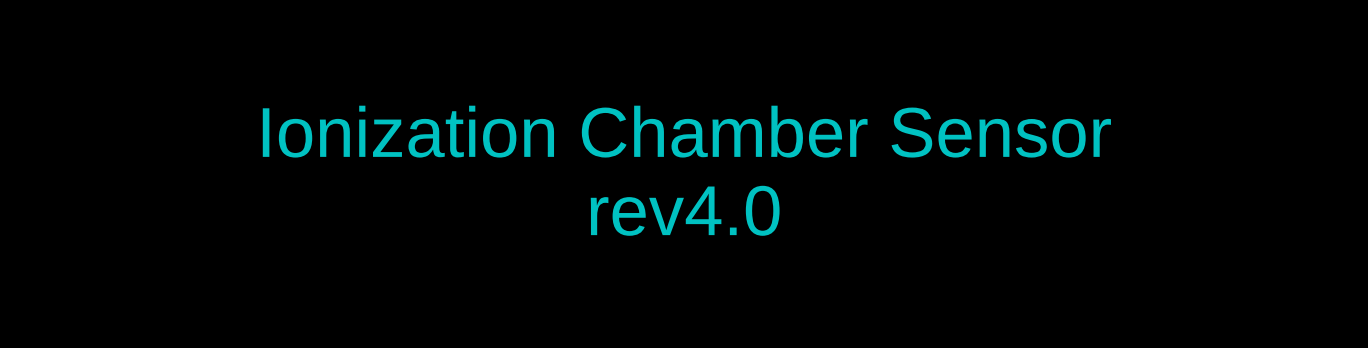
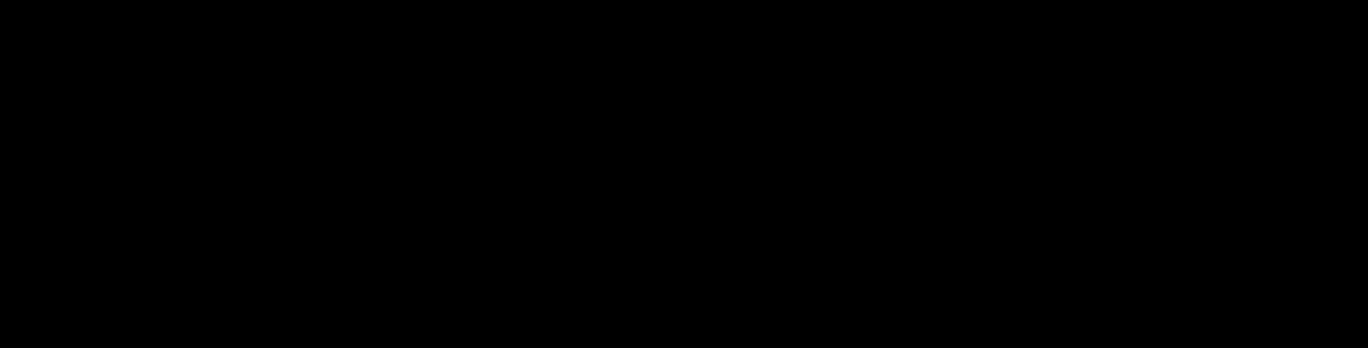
text: Ionization Chamber Sensor (686, 131) -> none
text: rev4.0 (685, 210) -> none

